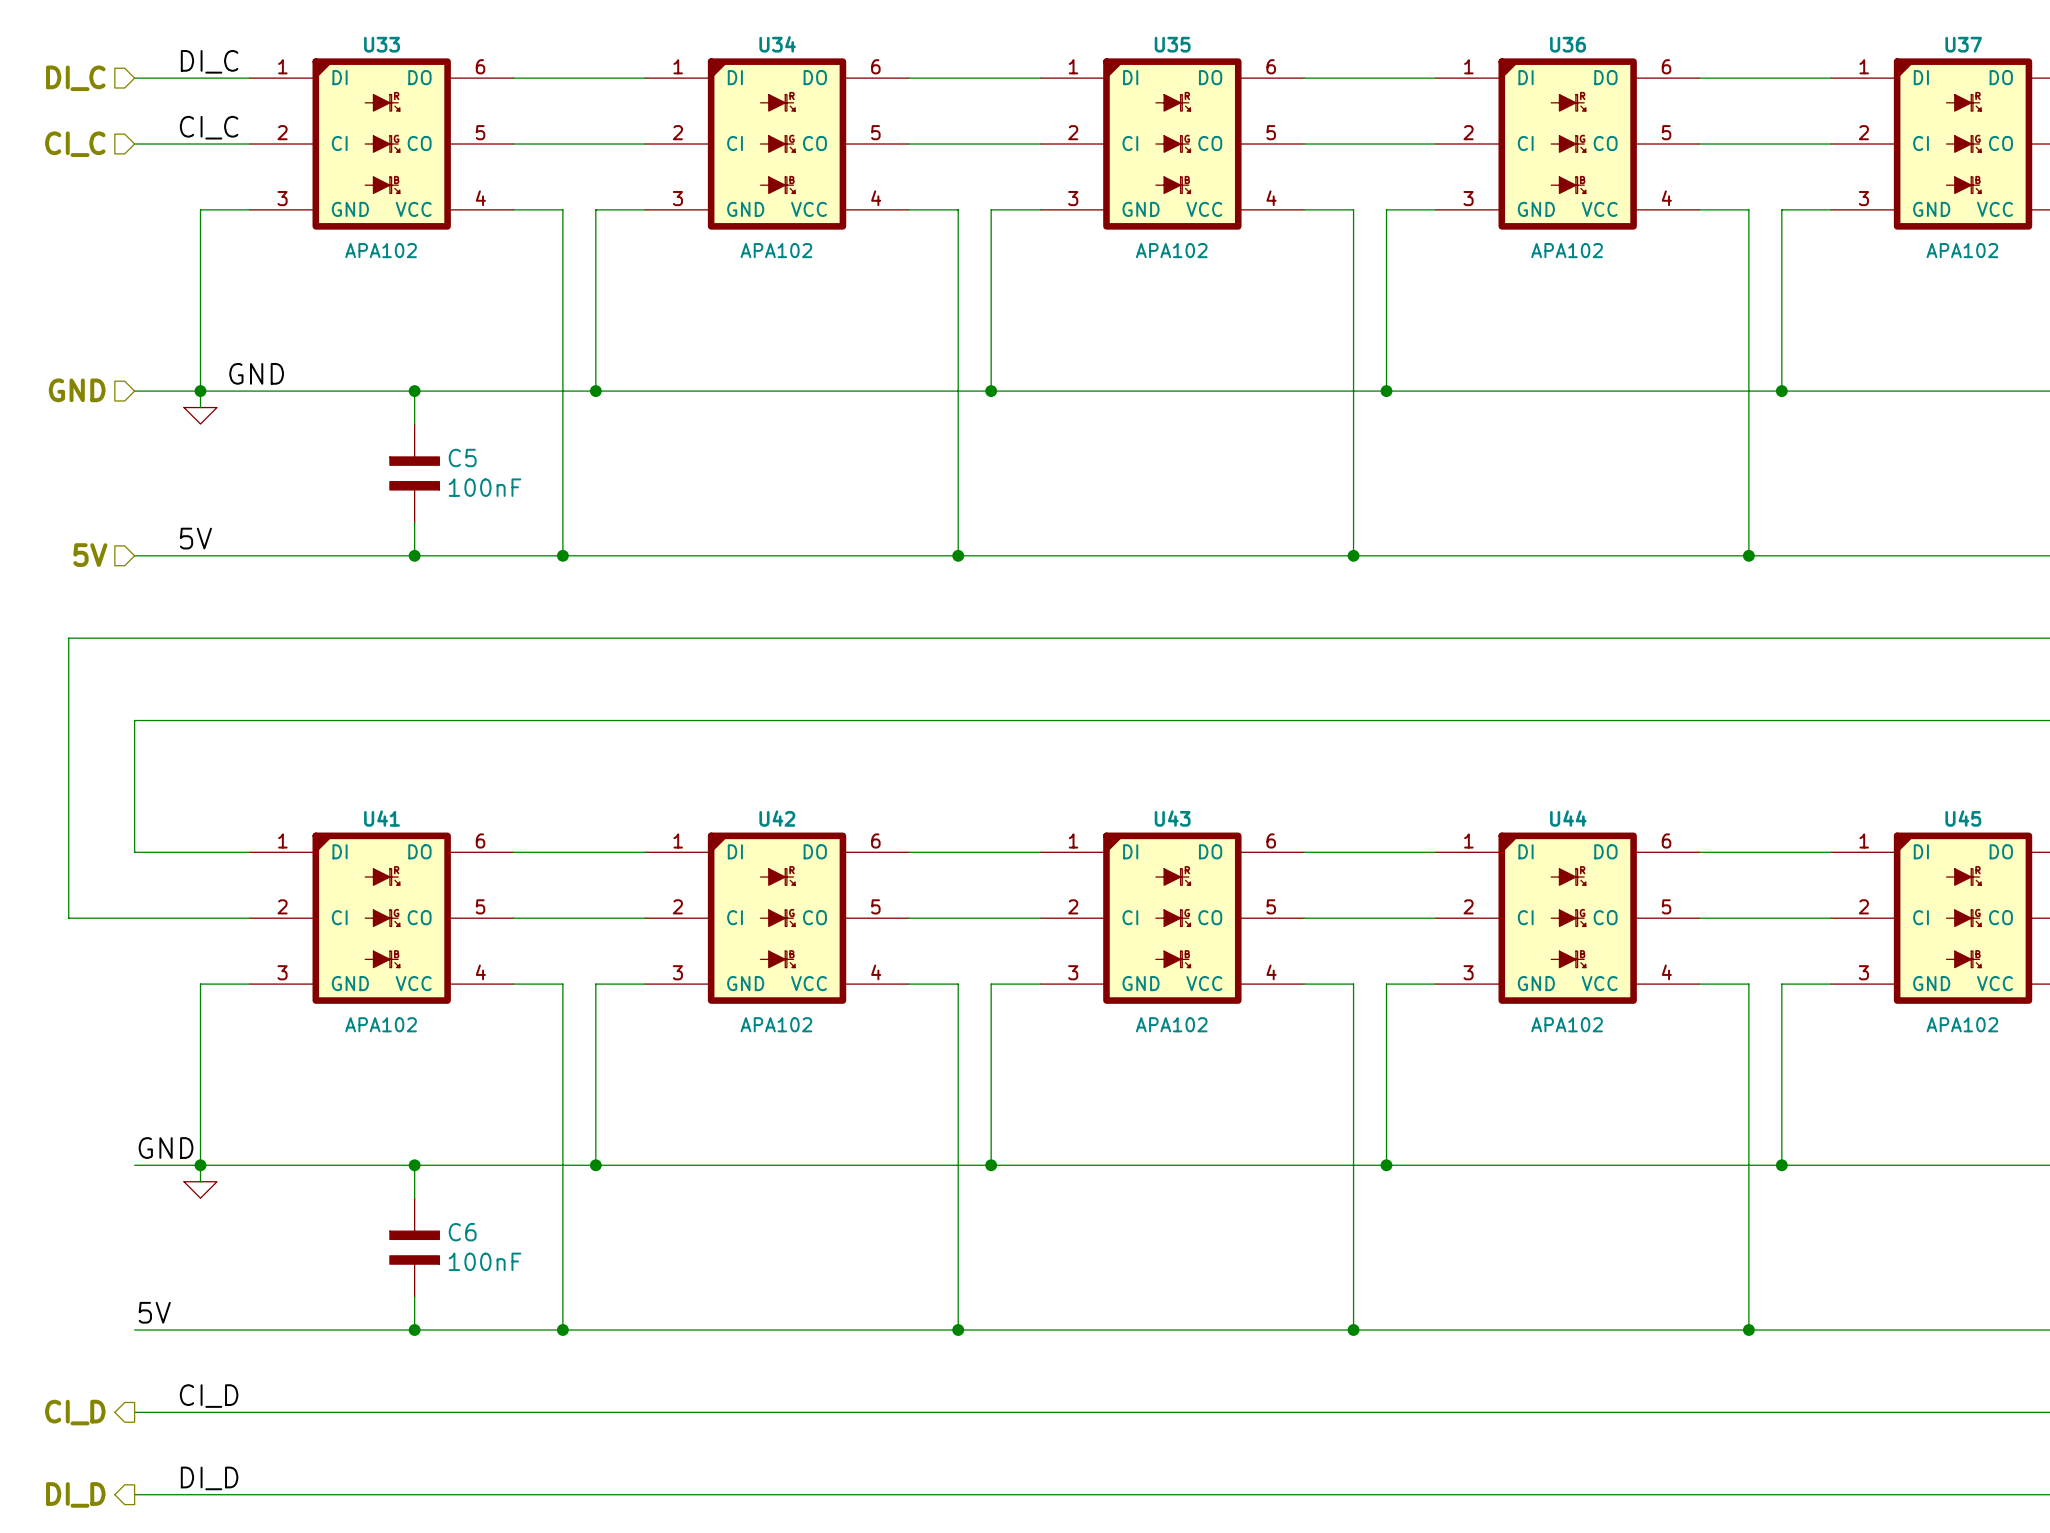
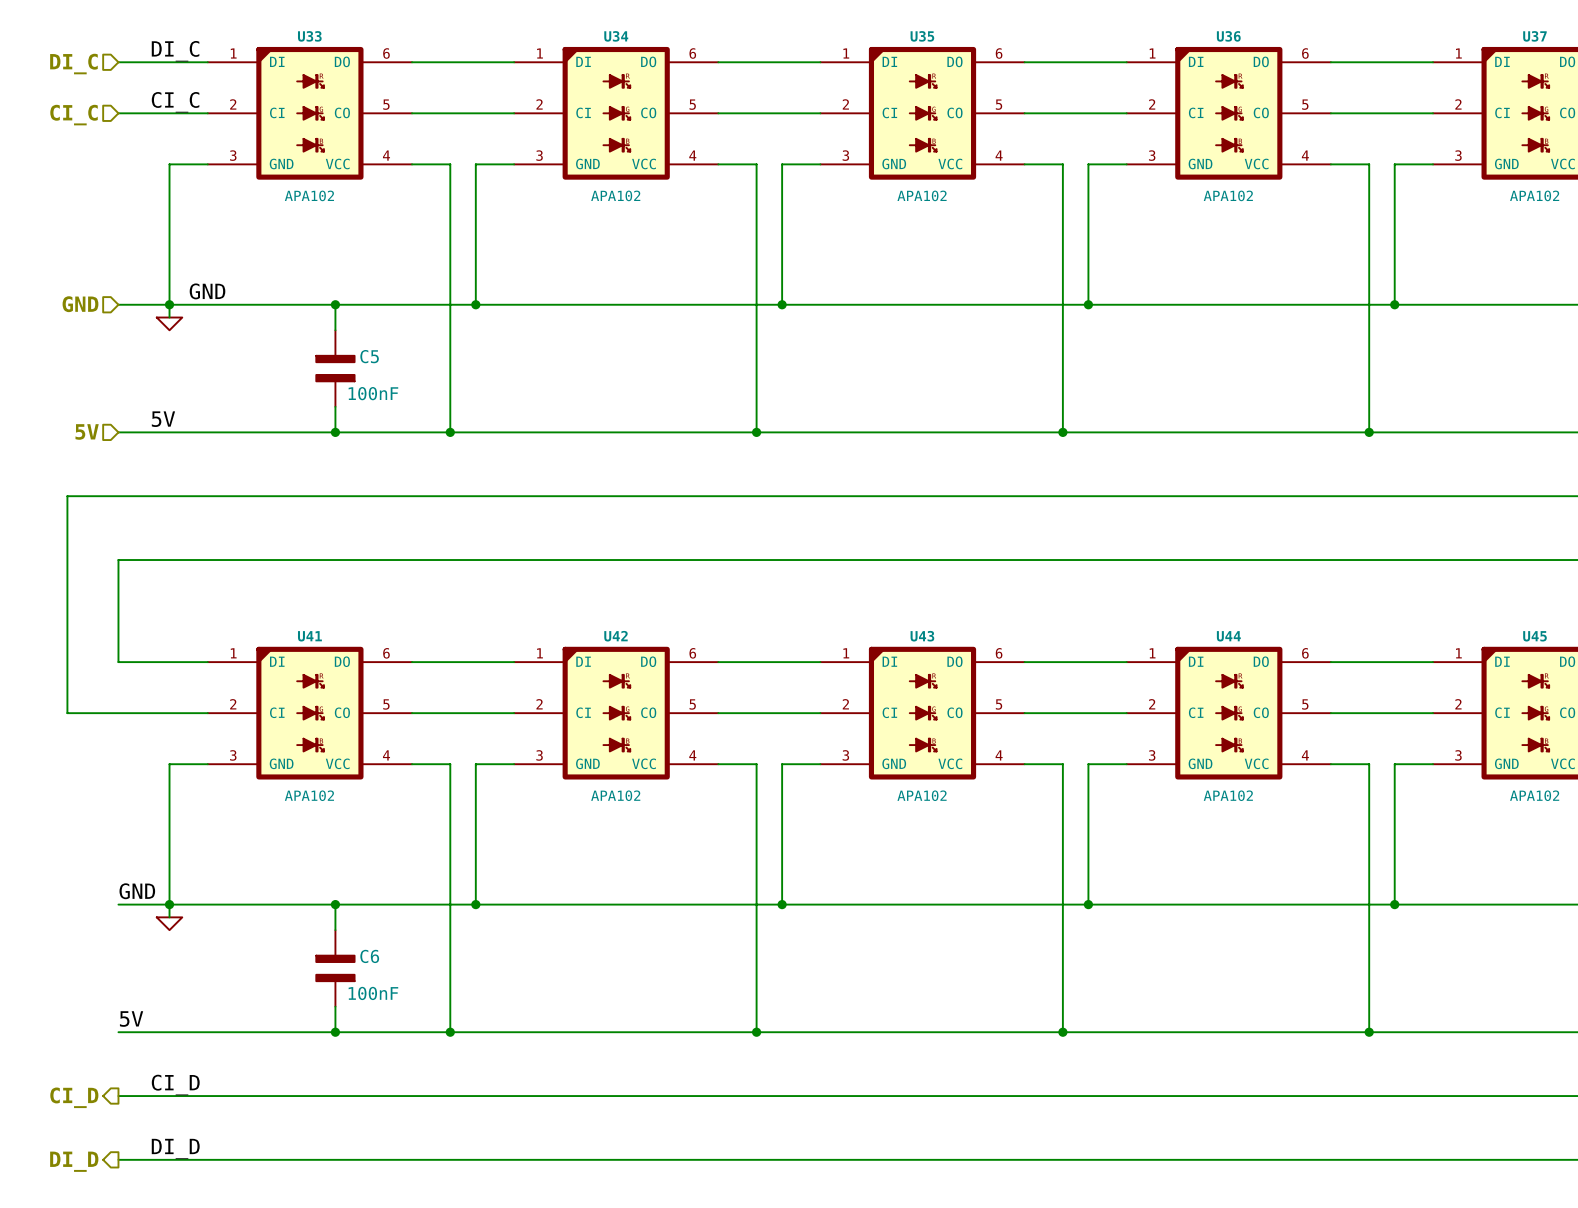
C5 value position: 100nF (485, 487) -> 100nF (373, 393)
C6 value position: 100nF (485, 1261) -> 100nF (373, 993)

